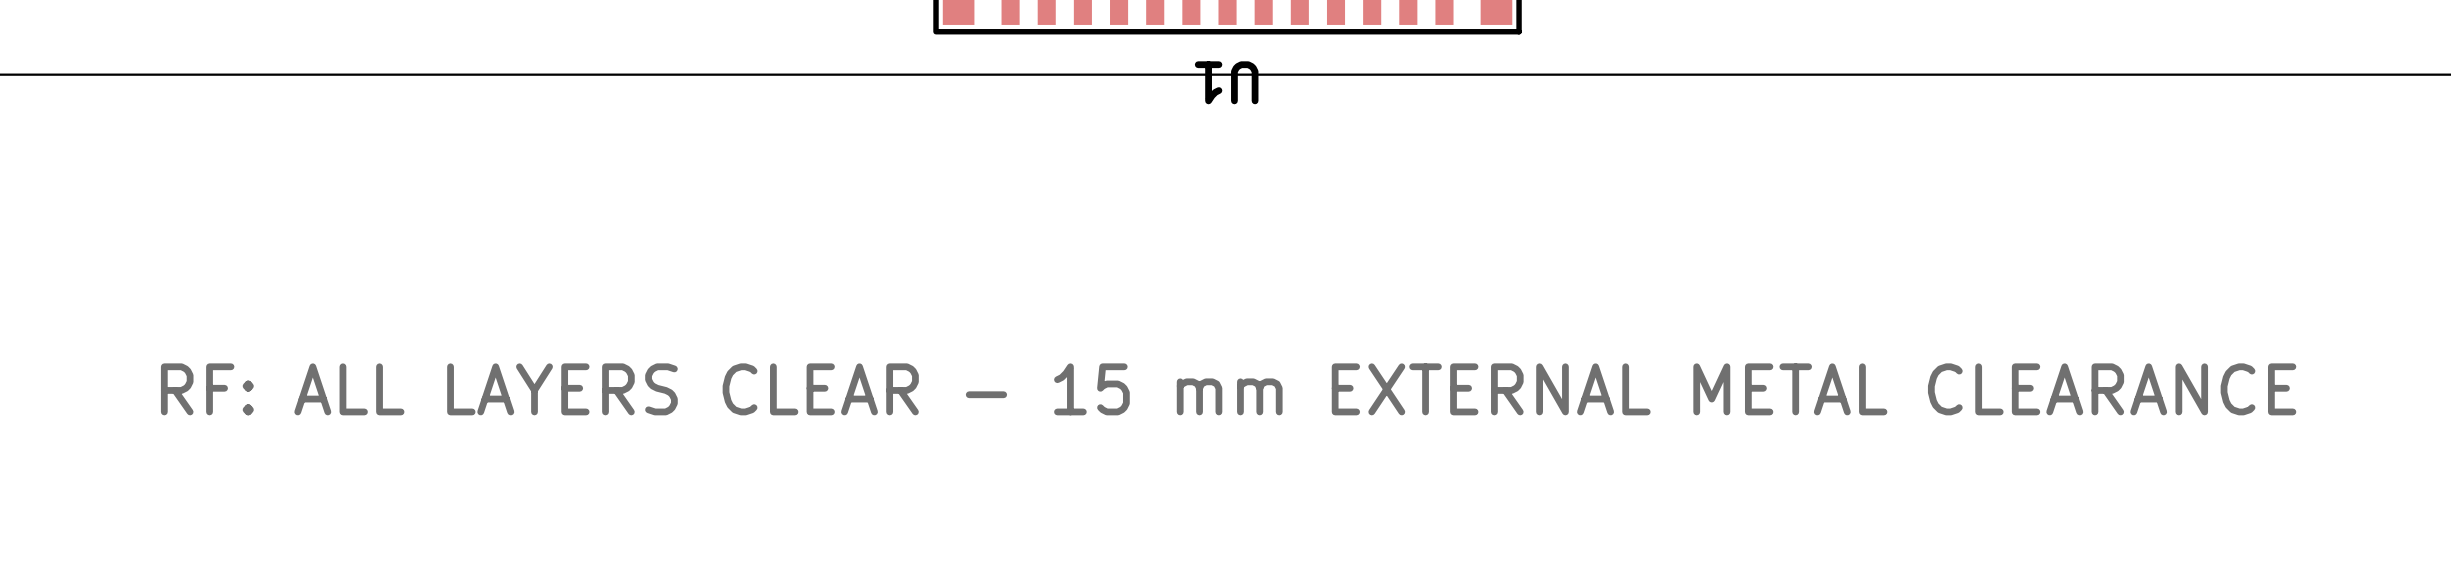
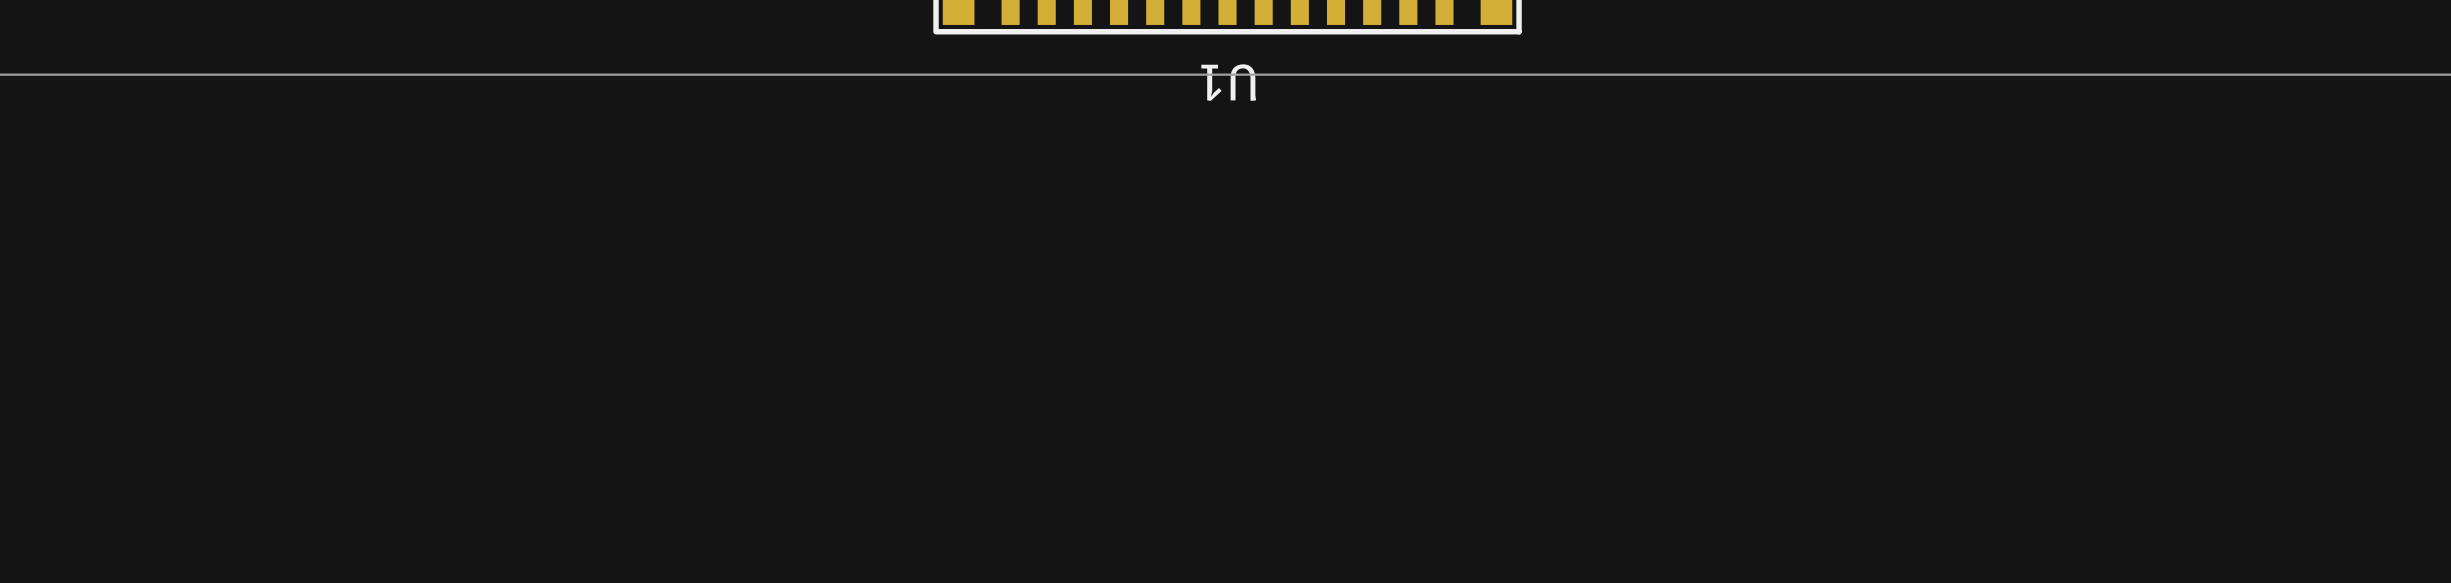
text: RF: ALL LAYERS CLEAR - 15 mm EXTERNAL METAL CLEARANCE (1228, 389) -> none

